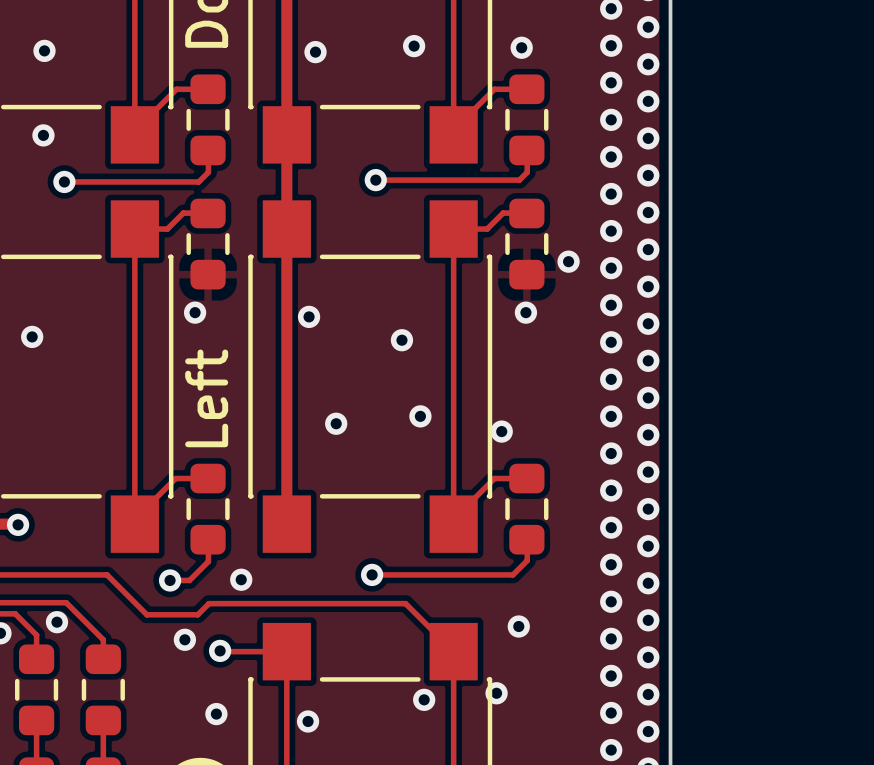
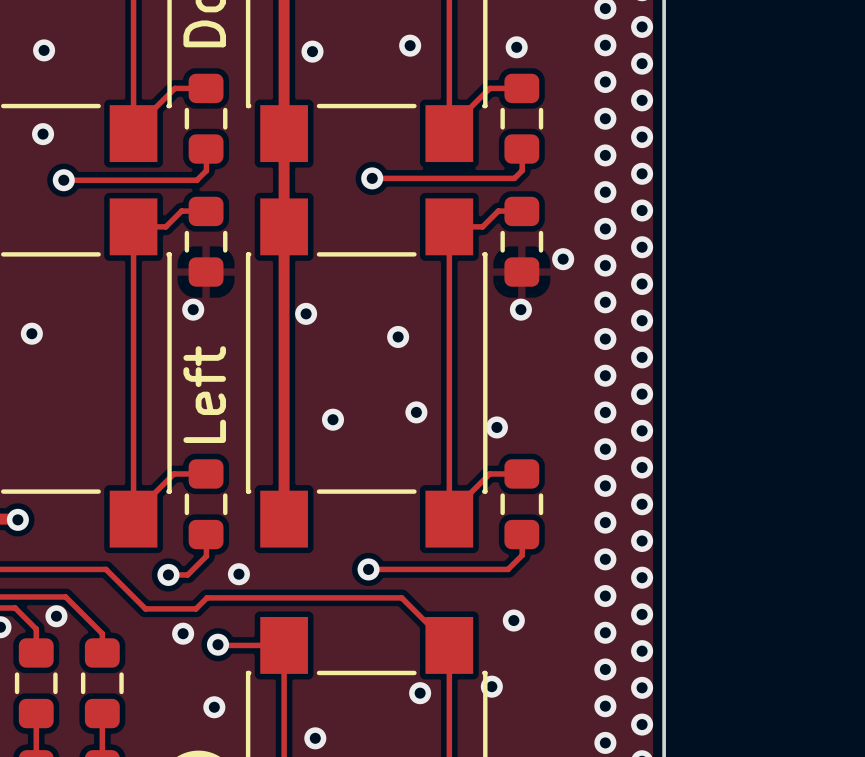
via: (308, 721) -> none
via: none -> (315, 738)

